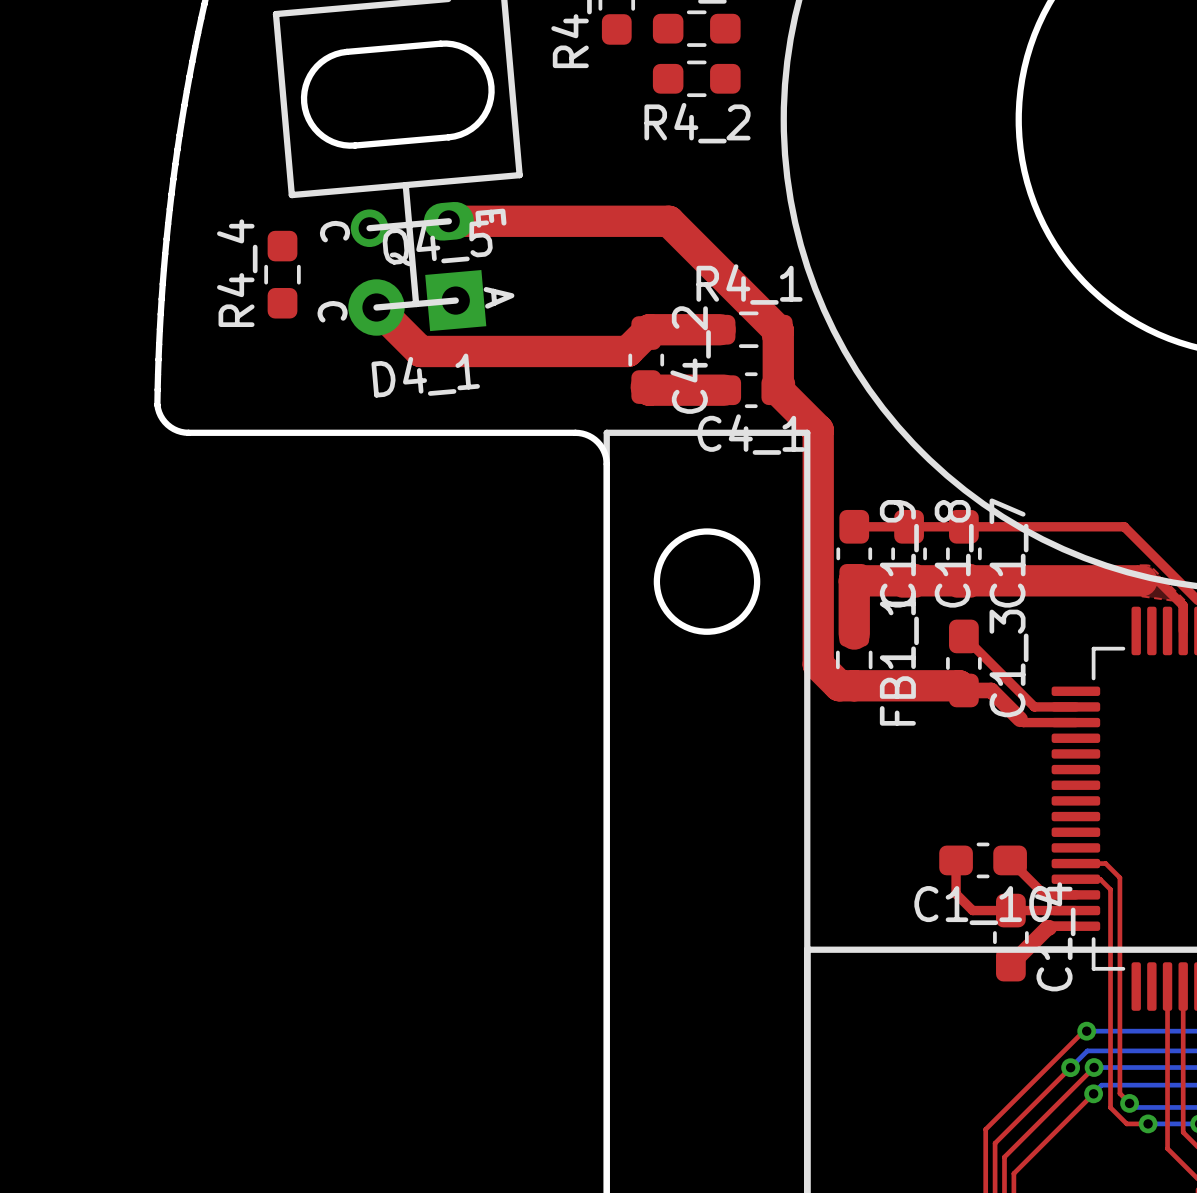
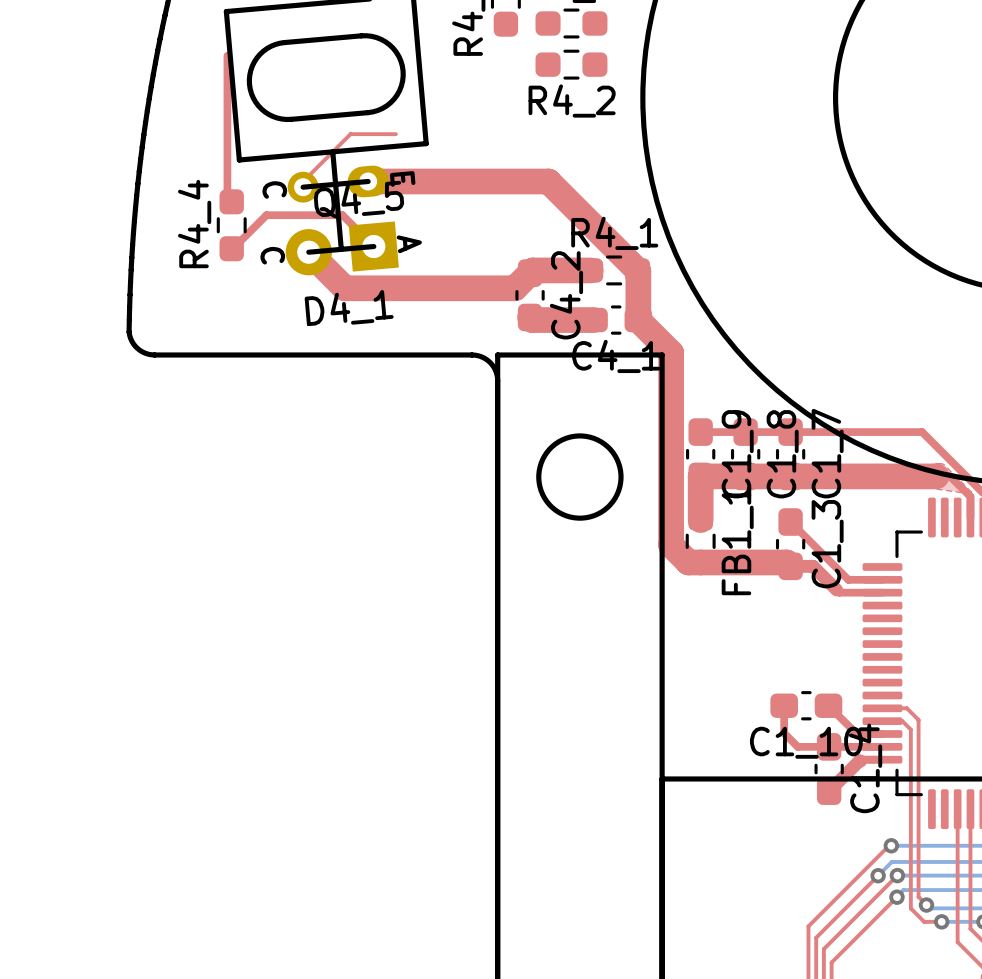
top track: none -> (227, 55) (227, 198) (231, 203)
top track: none -> (395, 134) (350, 134) (303, 181) (303, 187)
top track: none -> (373, 246) (342, 215) (266, 215) (231, 249)

